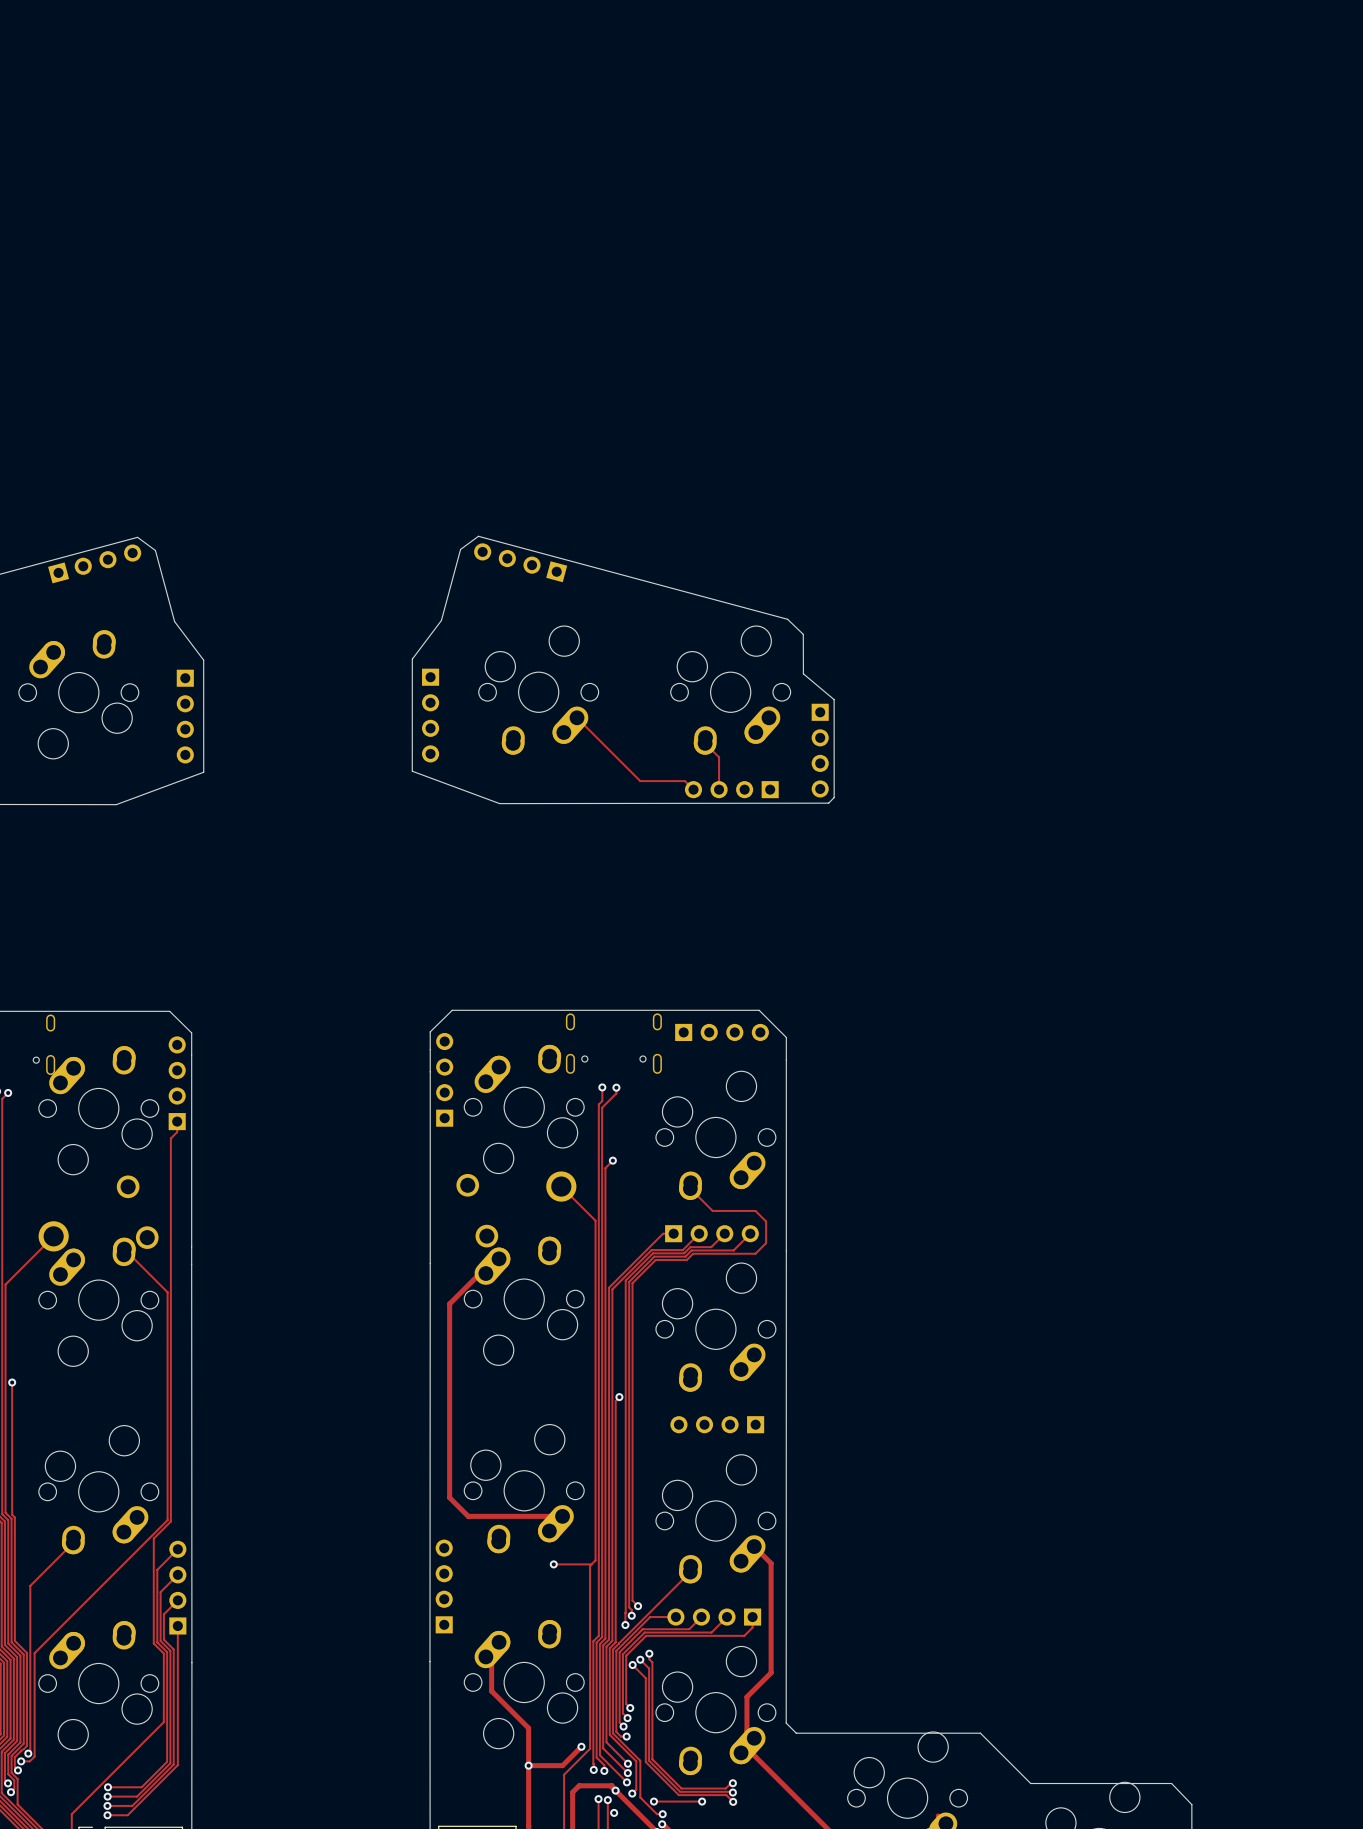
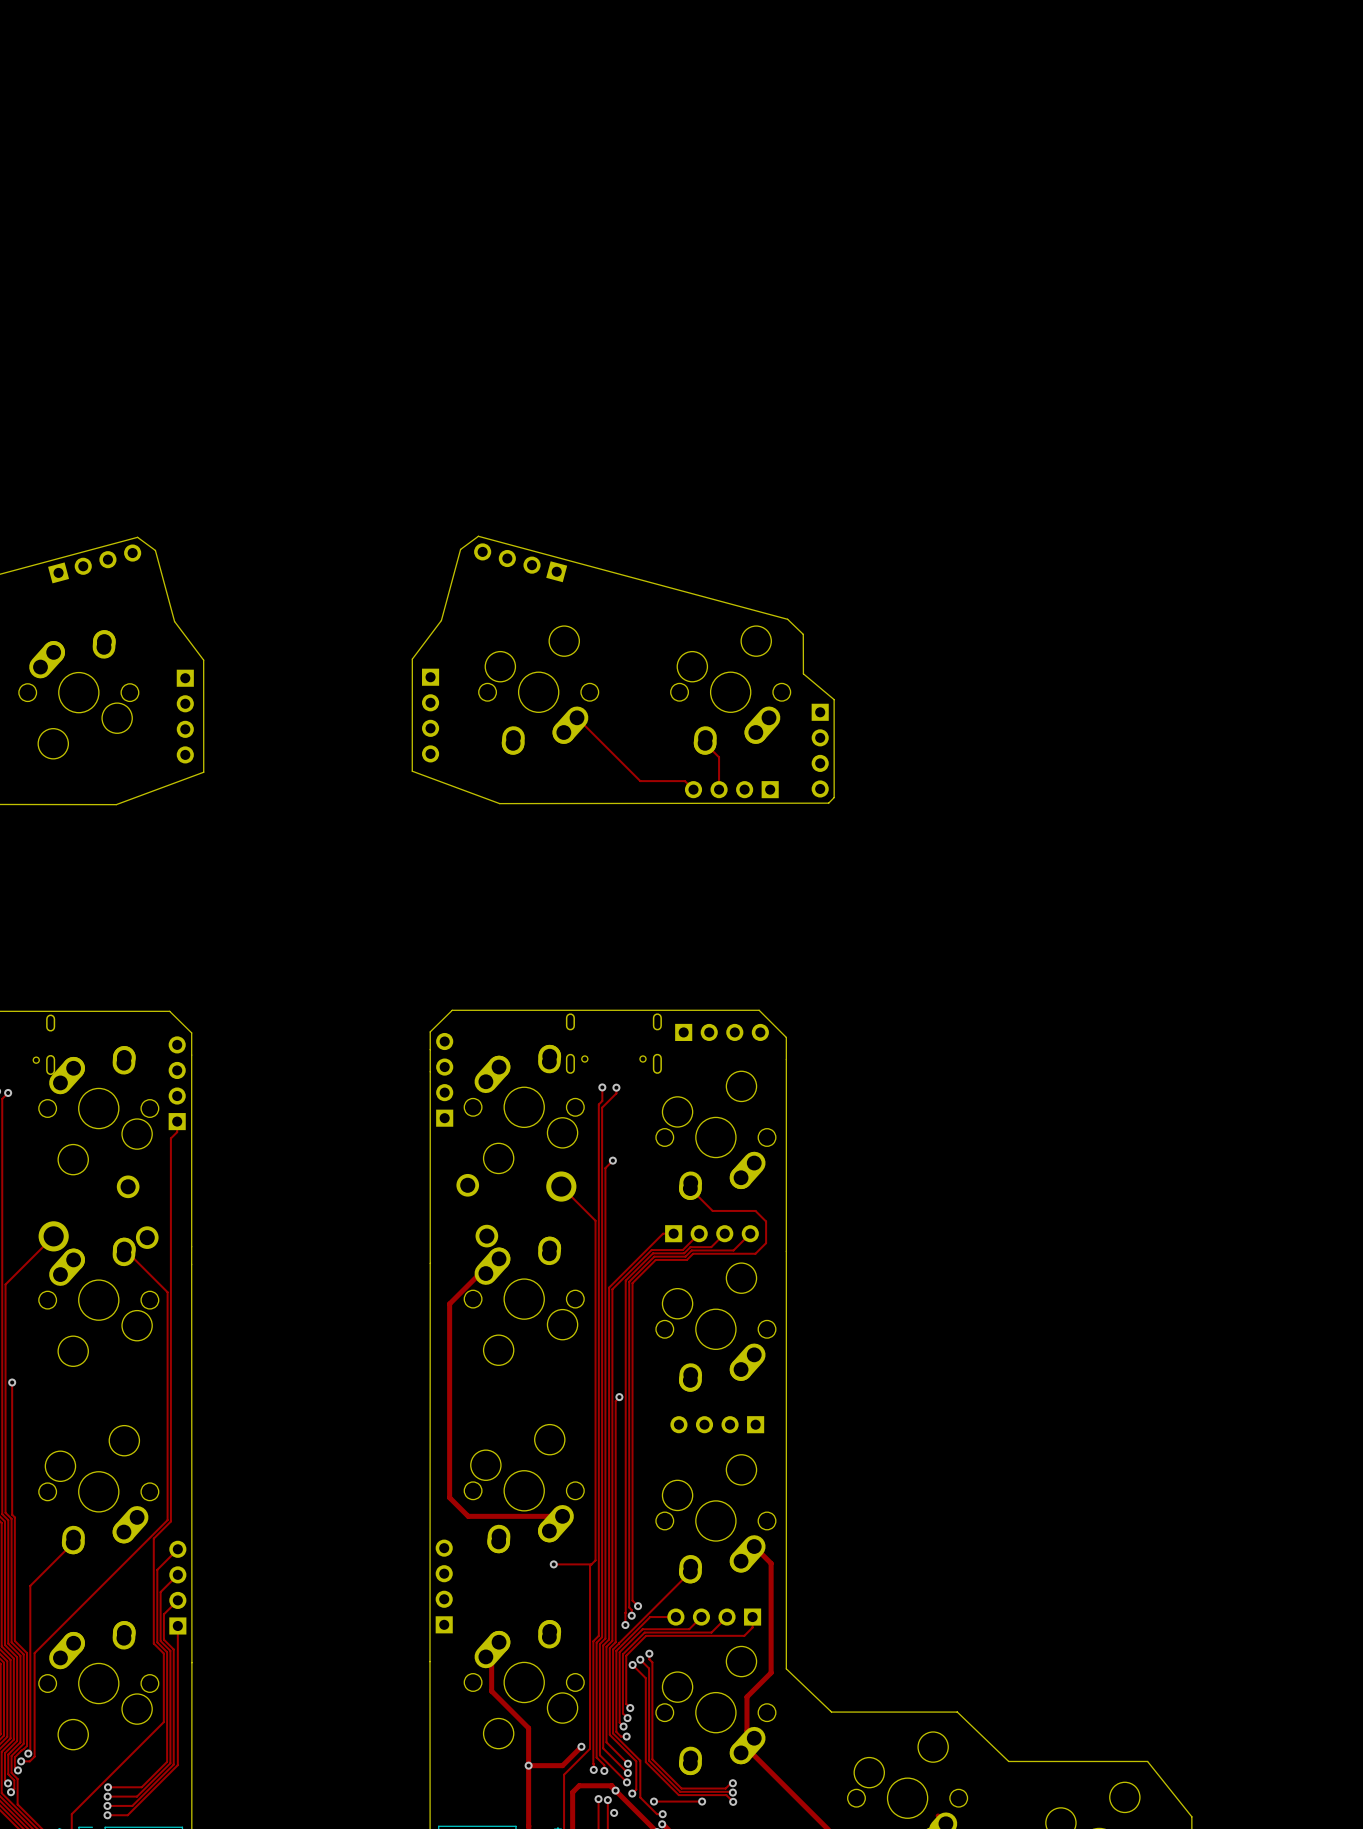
board edge: (786, 1251) (786, 1723) (796, 1733) (980, 1733) (1030, 1783) (1171, 1783) (1191, 1804) (1191, 1816) -> (786, 1251) (786, 1668) (831, 1712) (957, 1712)
board edge: none -> (957, 1712) (1008, 1761) (1147, 1761) (1191, 1816)

